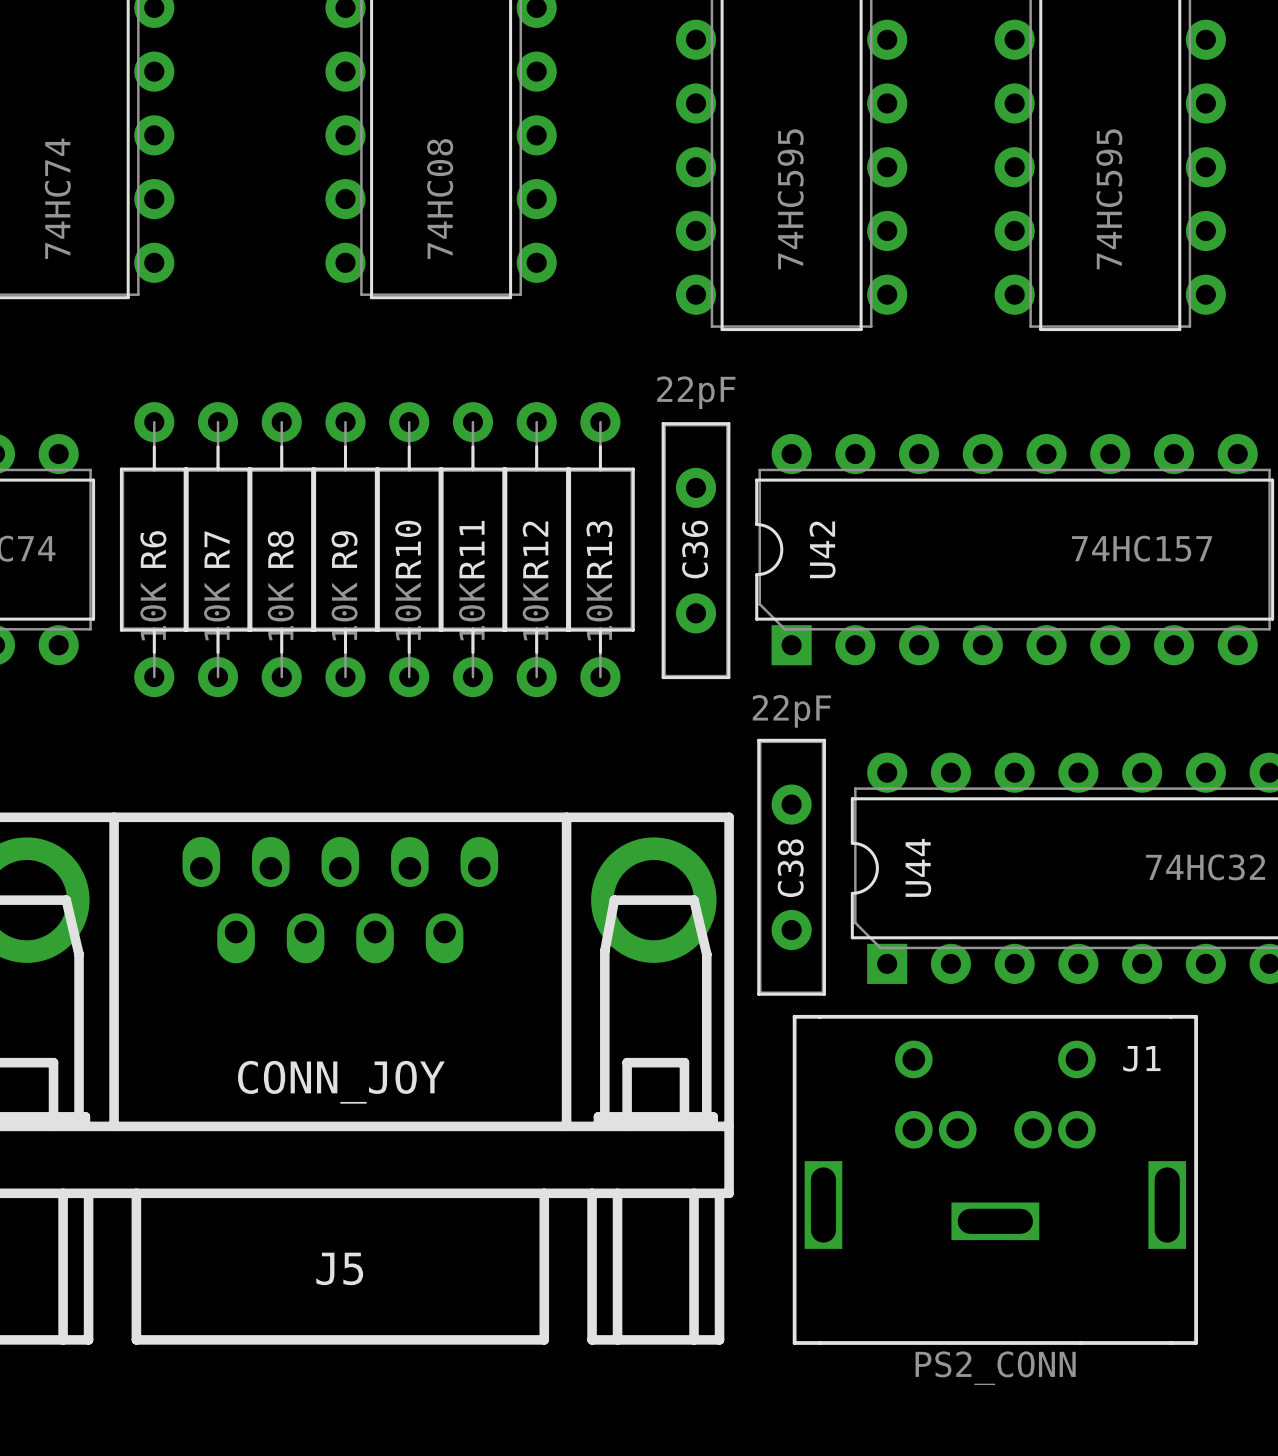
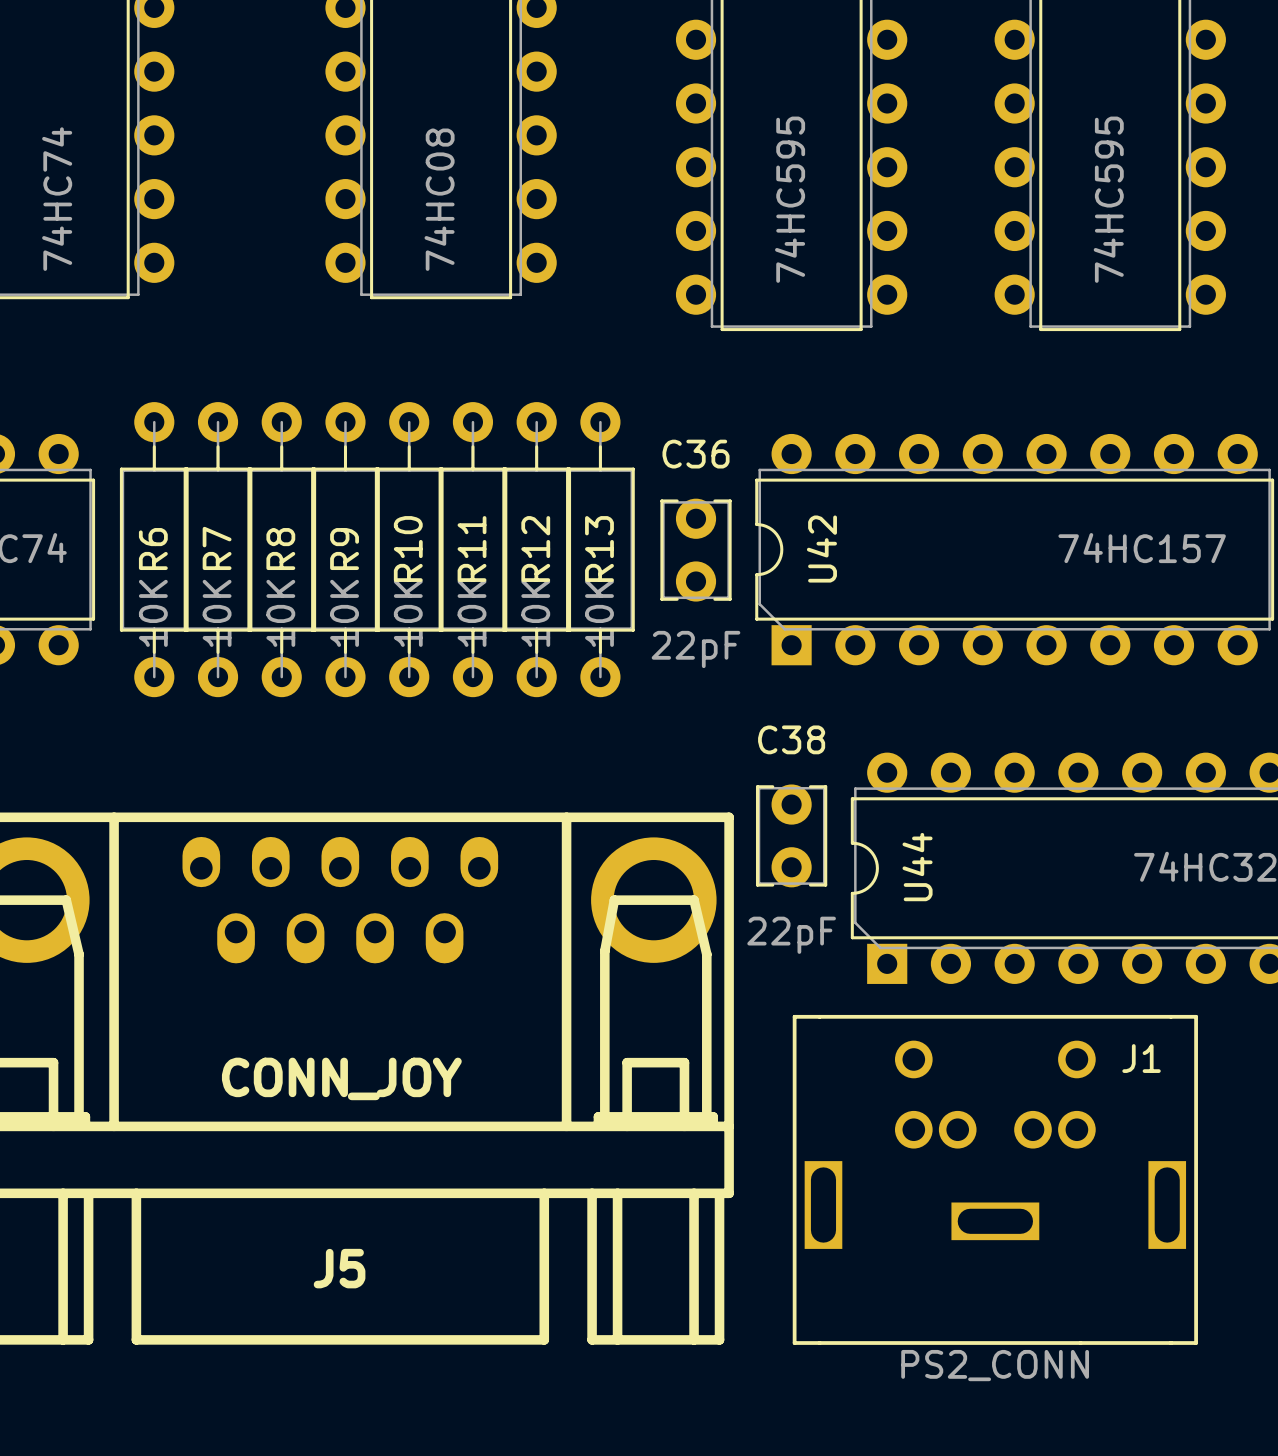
C36 value position: 22pF (696, 392) -> 22pF (696, 649)
C36 footprint: [661, 422, 731, 680] -> [660, 498, 732, 602]
C36 name position: C36 (695, 549) -> C36 (696, 454)
C38 value position: 22pF (791, 711) -> 22pF (791, 935)
C38 footprint: [757, 738, 826, 996] -> [755, 784, 828, 888]
C38 name position: C38 (790, 868) -> C38 (791, 739)

